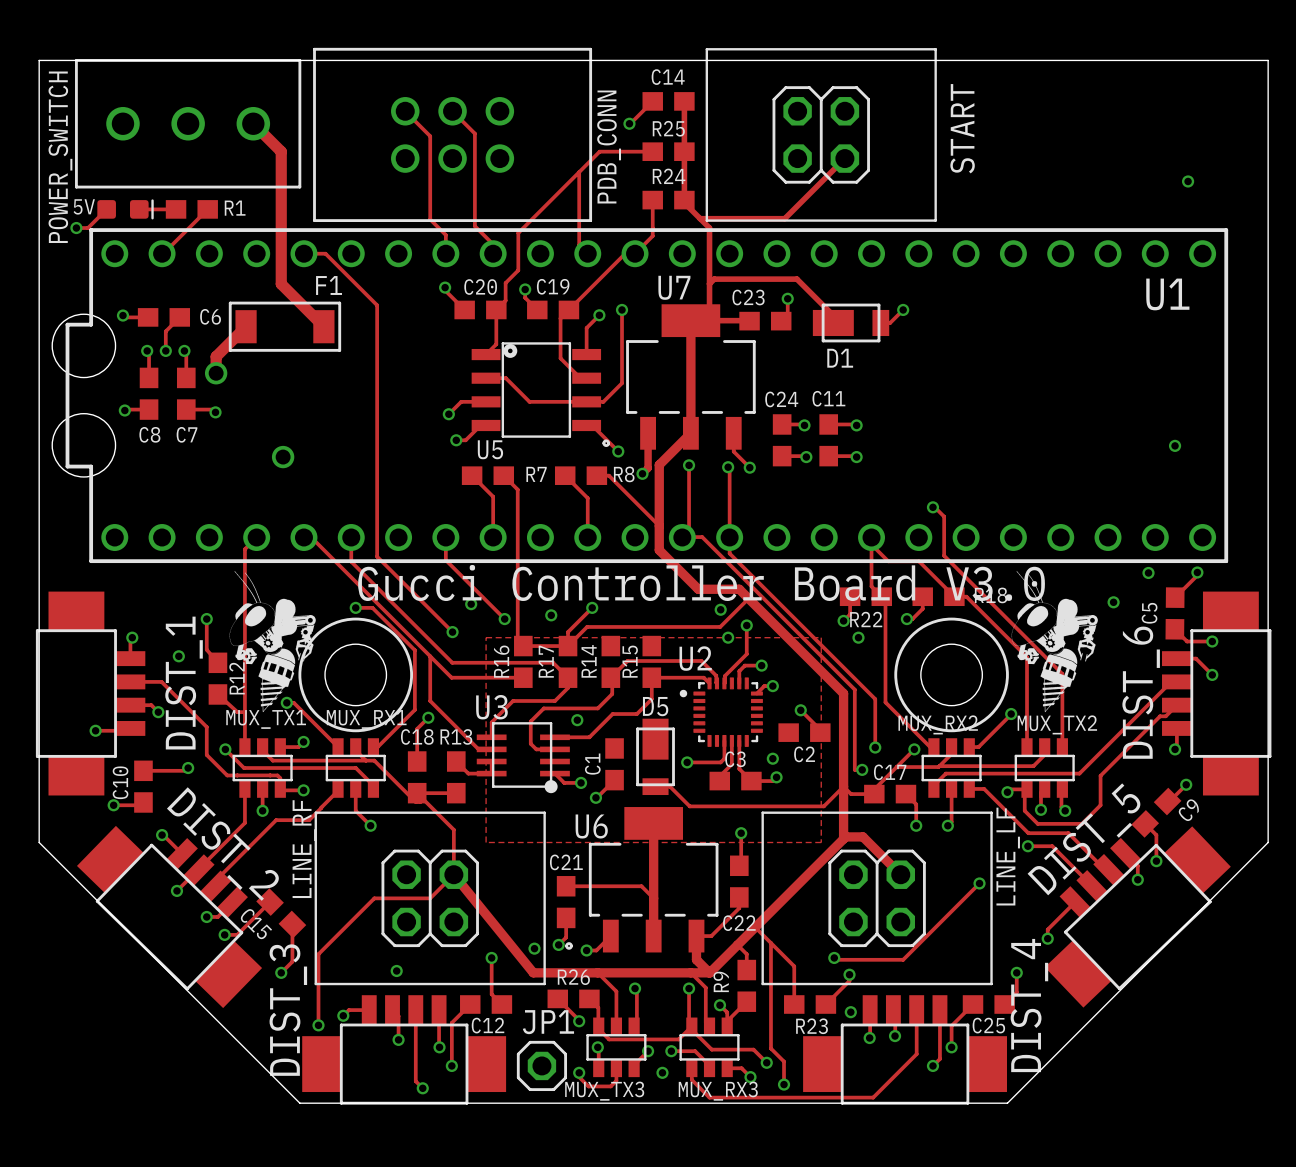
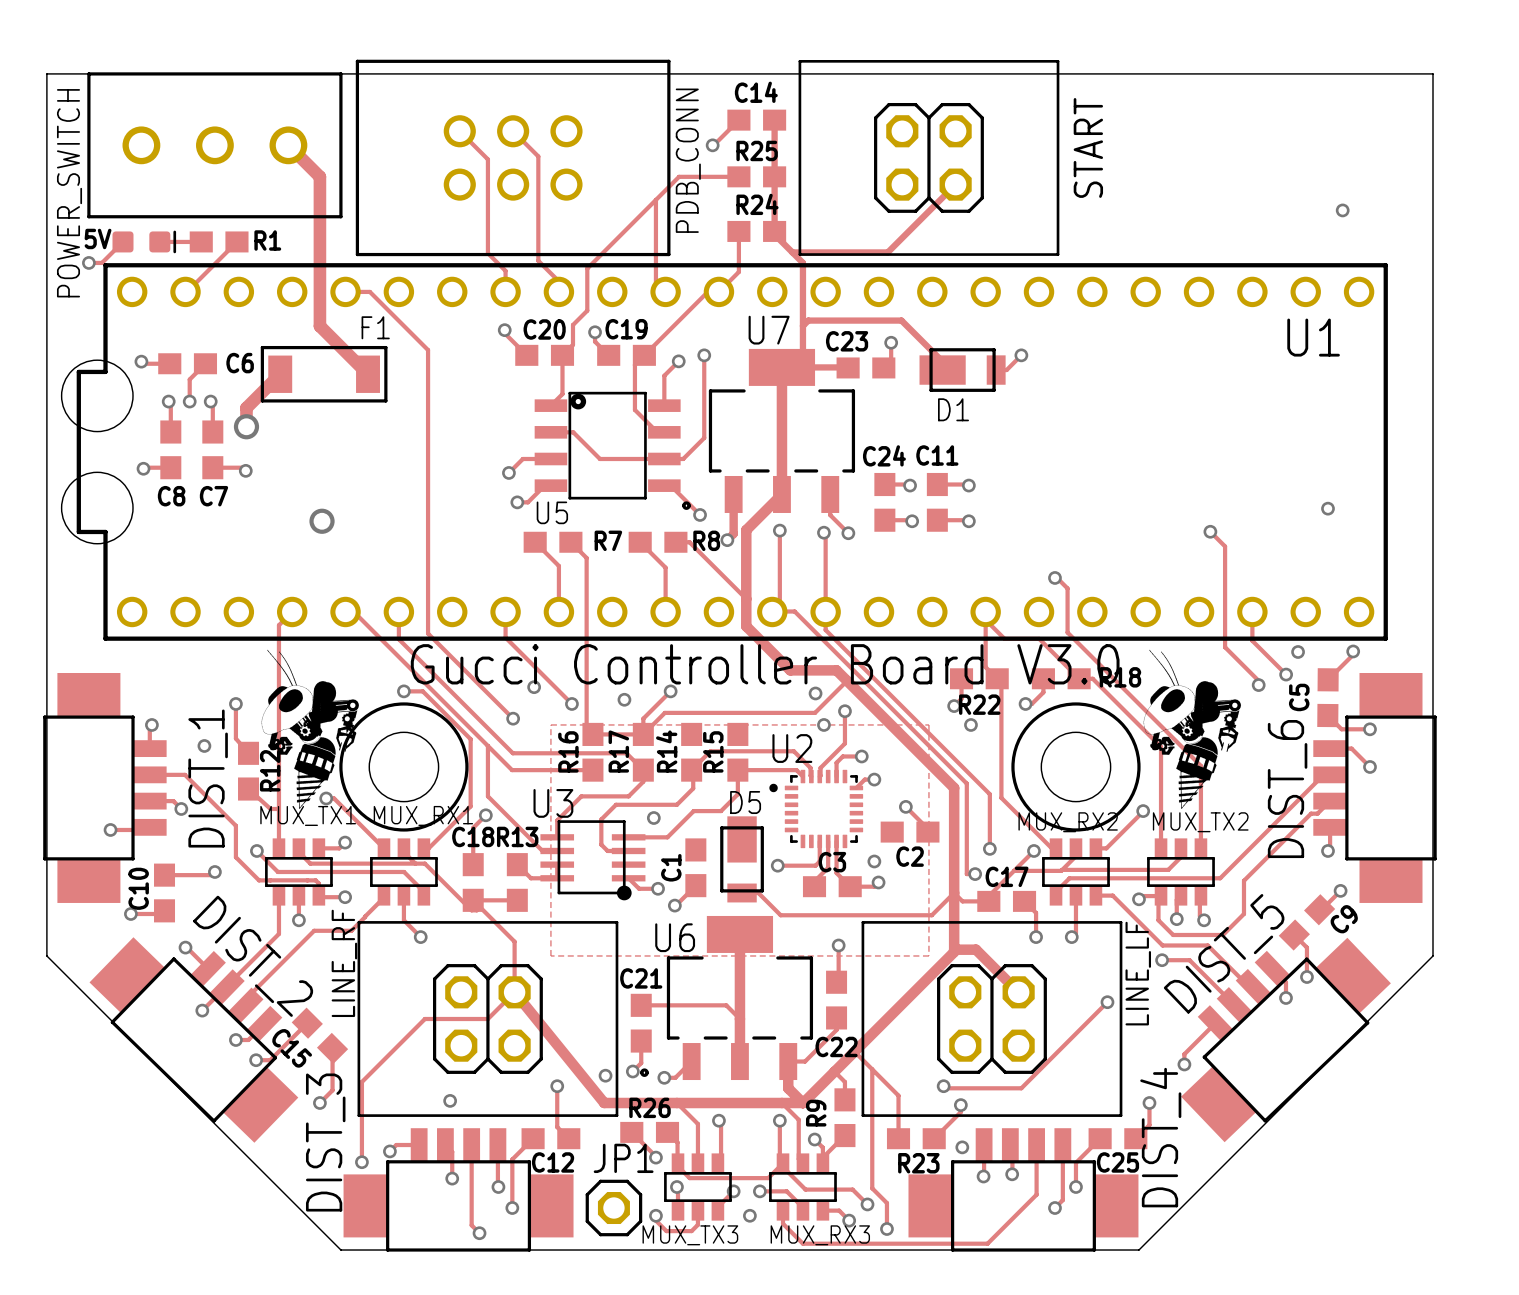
track: none -> (1210, 531) (1225, 546) (1225, 647) (1260, 682)
via: none -> (1210, 531)
track: none -> (1252, 611) (1252, 640) (1286, 674)
via: none -> (1286, 674)

